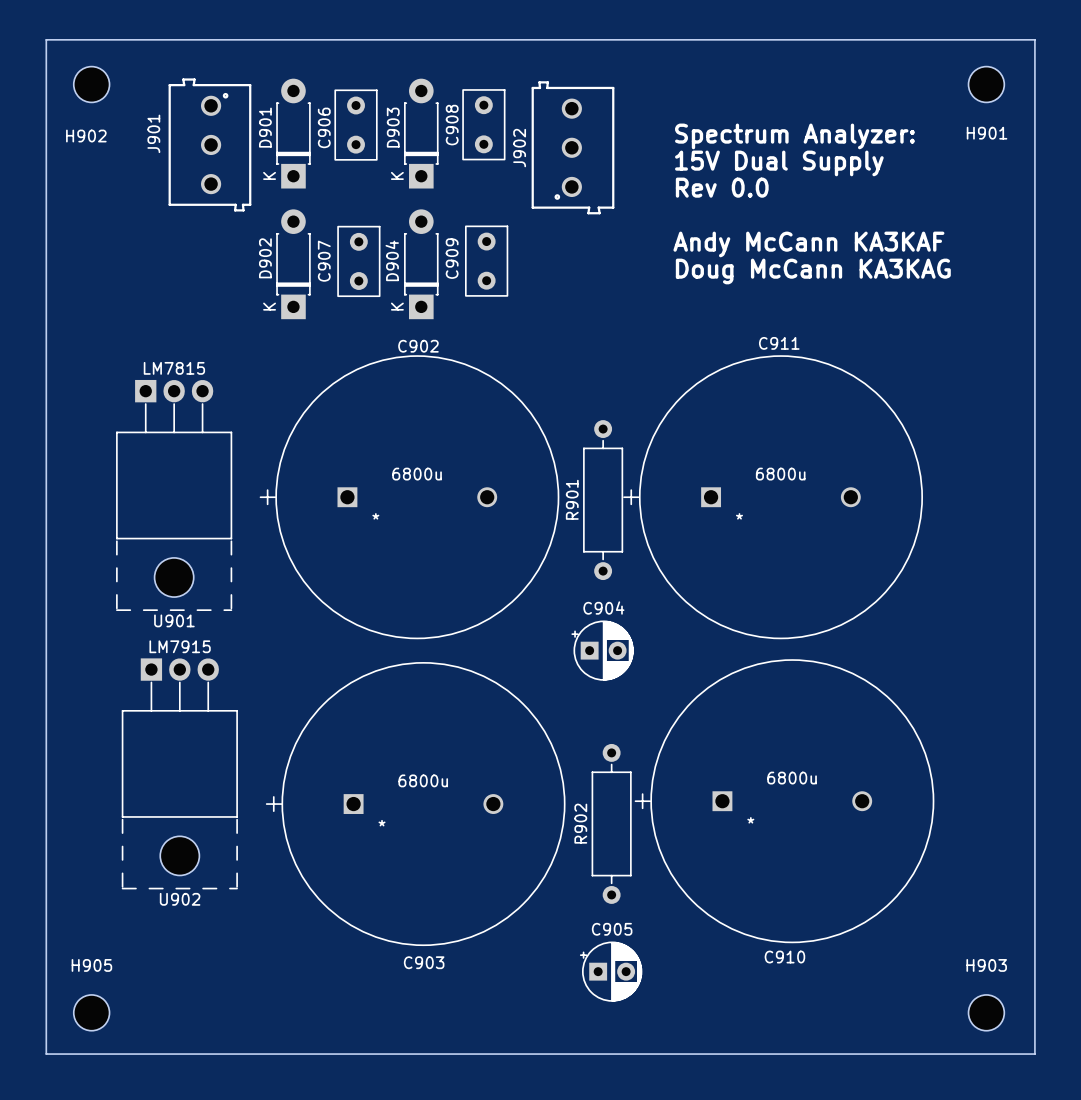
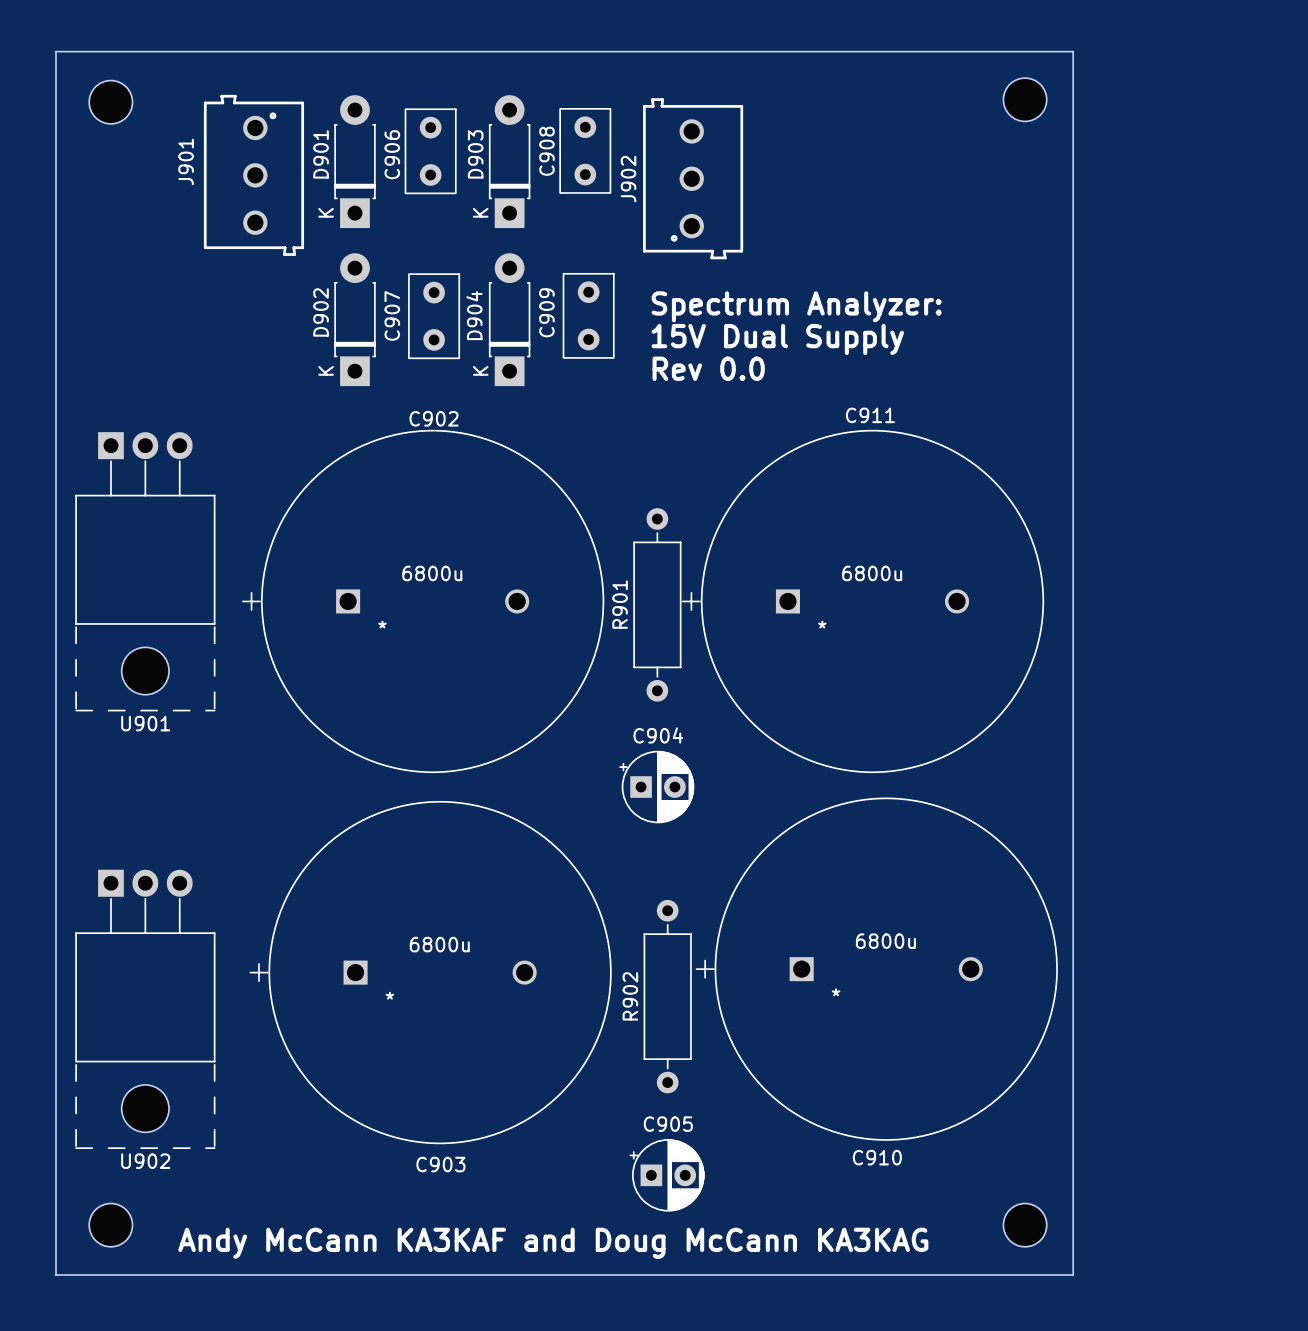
board edge: (46, 42) (46, 39) (1034, 39) (1034, 1054) (887, 1054) -> (56, 51) (1073, 51) (1073, 1275)
part: none -> (1025, 99)
H901: (986, 84) -> none
H902 name: H902 (86, 136) -> none
text position: Spectrum Analyzer: (794, 136) -> Spectrum Analyzer: (796, 306)
text position: 15V Dual Supply (779, 163) -> 15V Dual Supply (777, 339)
text position: Rev 0.0 (722, 187) -> Rev 0.0 (708, 368)
text: Andy McCann KA3KAF (808, 244) -> none
text: Doug McCann KA3KAG (813, 271) -> none
U901 value: LM7815 (174, 368) -> none
U901 position: (174, 495) -> (145, 571)
C902 position: (409, 497) -> (423, 601)
C911 position: (773, 497) -> (863, 601)
R901 position: (603, 500) -> (657, 604)
U902 value: LM7915 (180, 646) -> none
C904 position: (602, 650) -> (656, 787)
U902 position: (179, 773) -> (145, 1009)
C910 position: (784, 801) -> (876, 969)
C903 position: (415, 804) -> (430, 972)
R902 position: (611, 823) -> (667, 996)
H905 name: H905 (91, 965) -> none
C905 position: (611, 971) -> (667, 1175)
part: none -> (1025, 1225)
H903: (986, 1012) -> none
text: none -> Andy McCann KA3KAF and Doug McCann KA3KAG (553, 1243)

